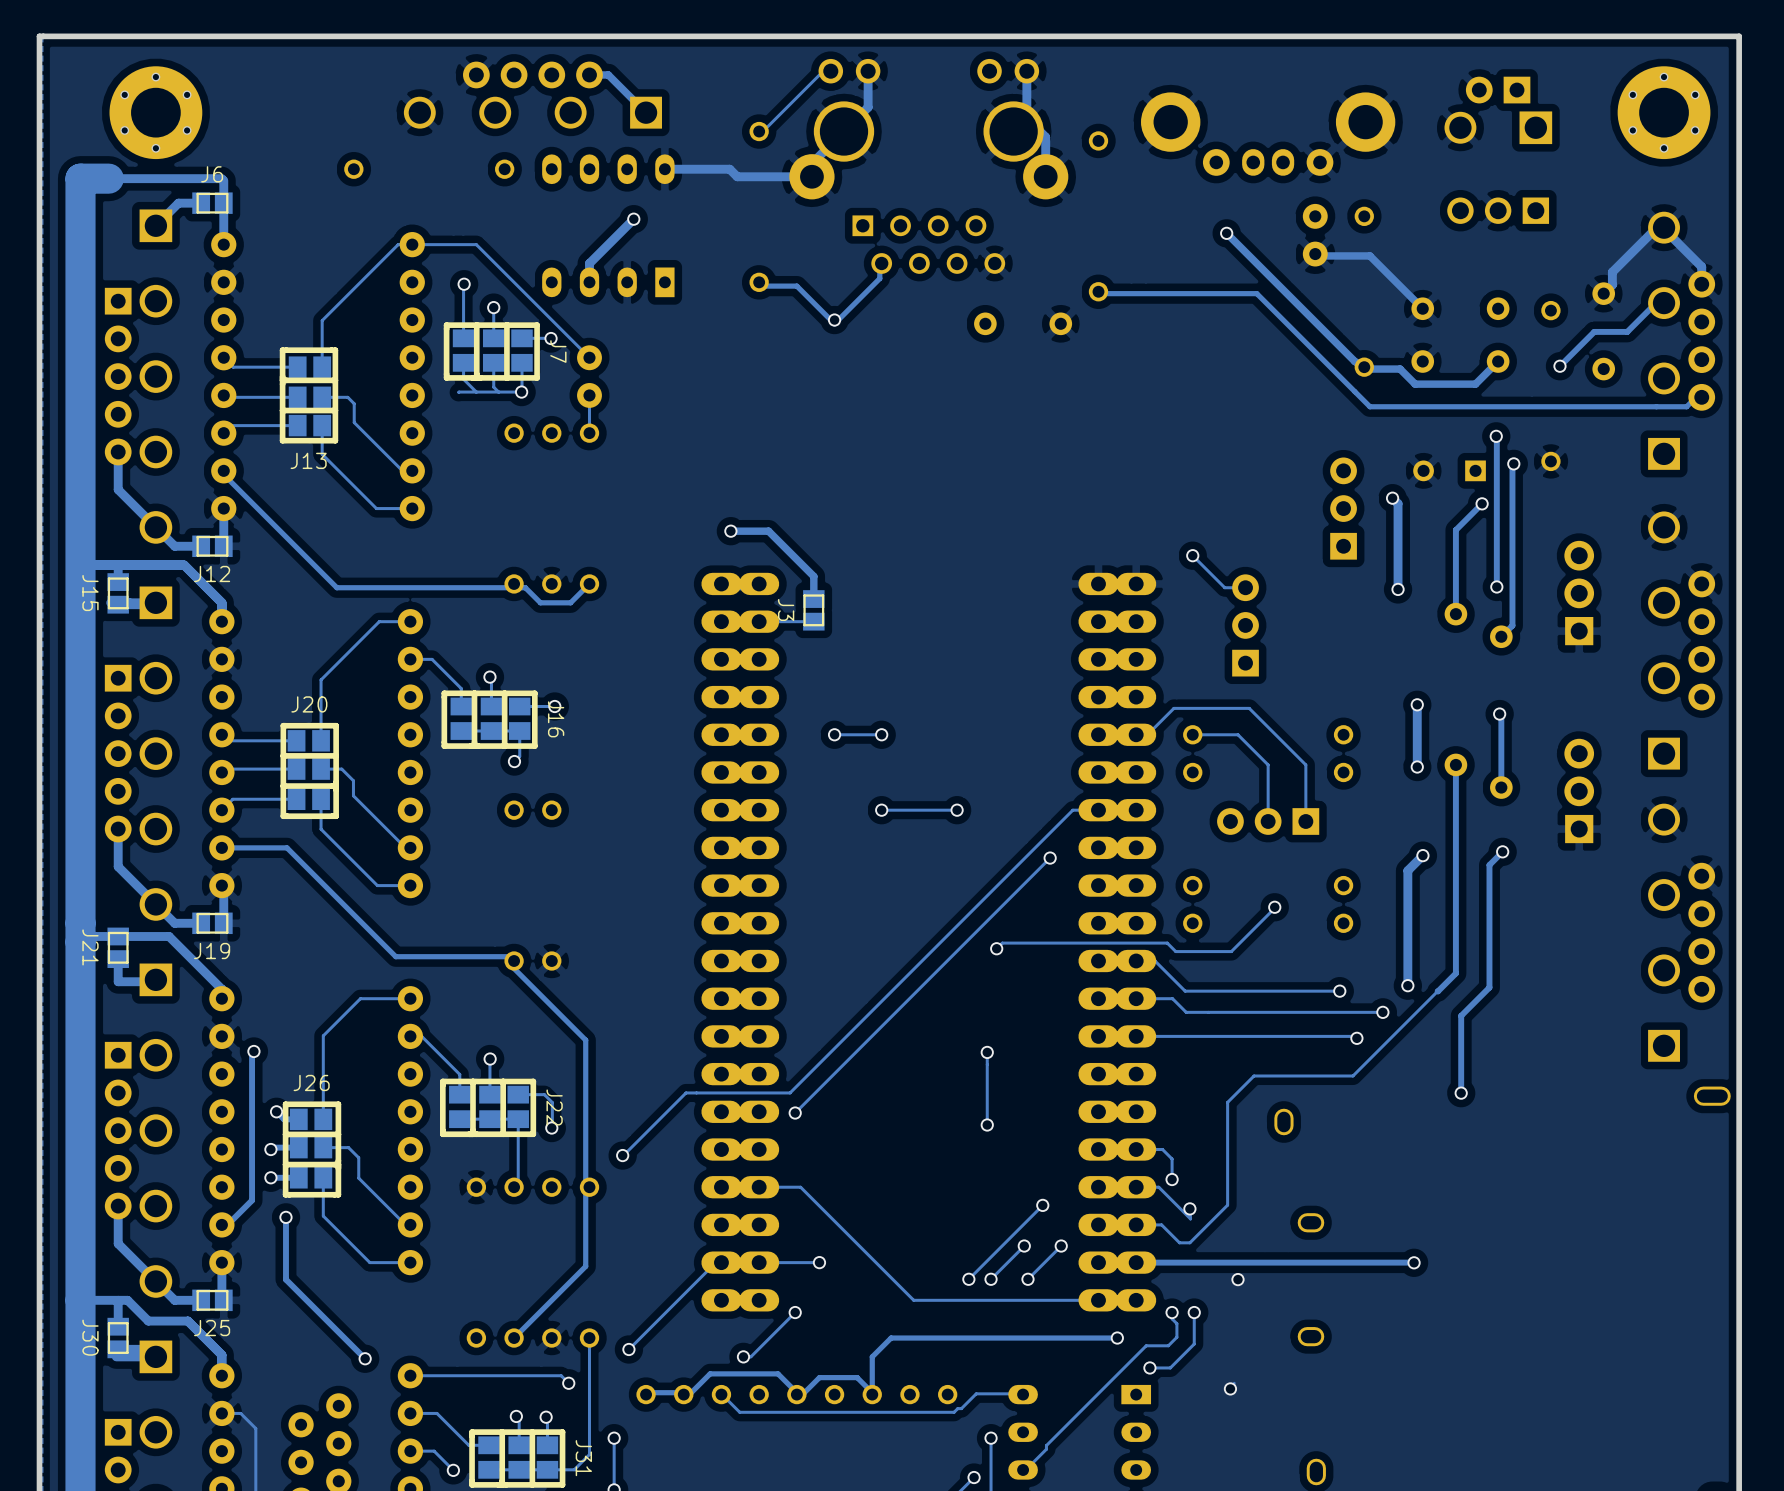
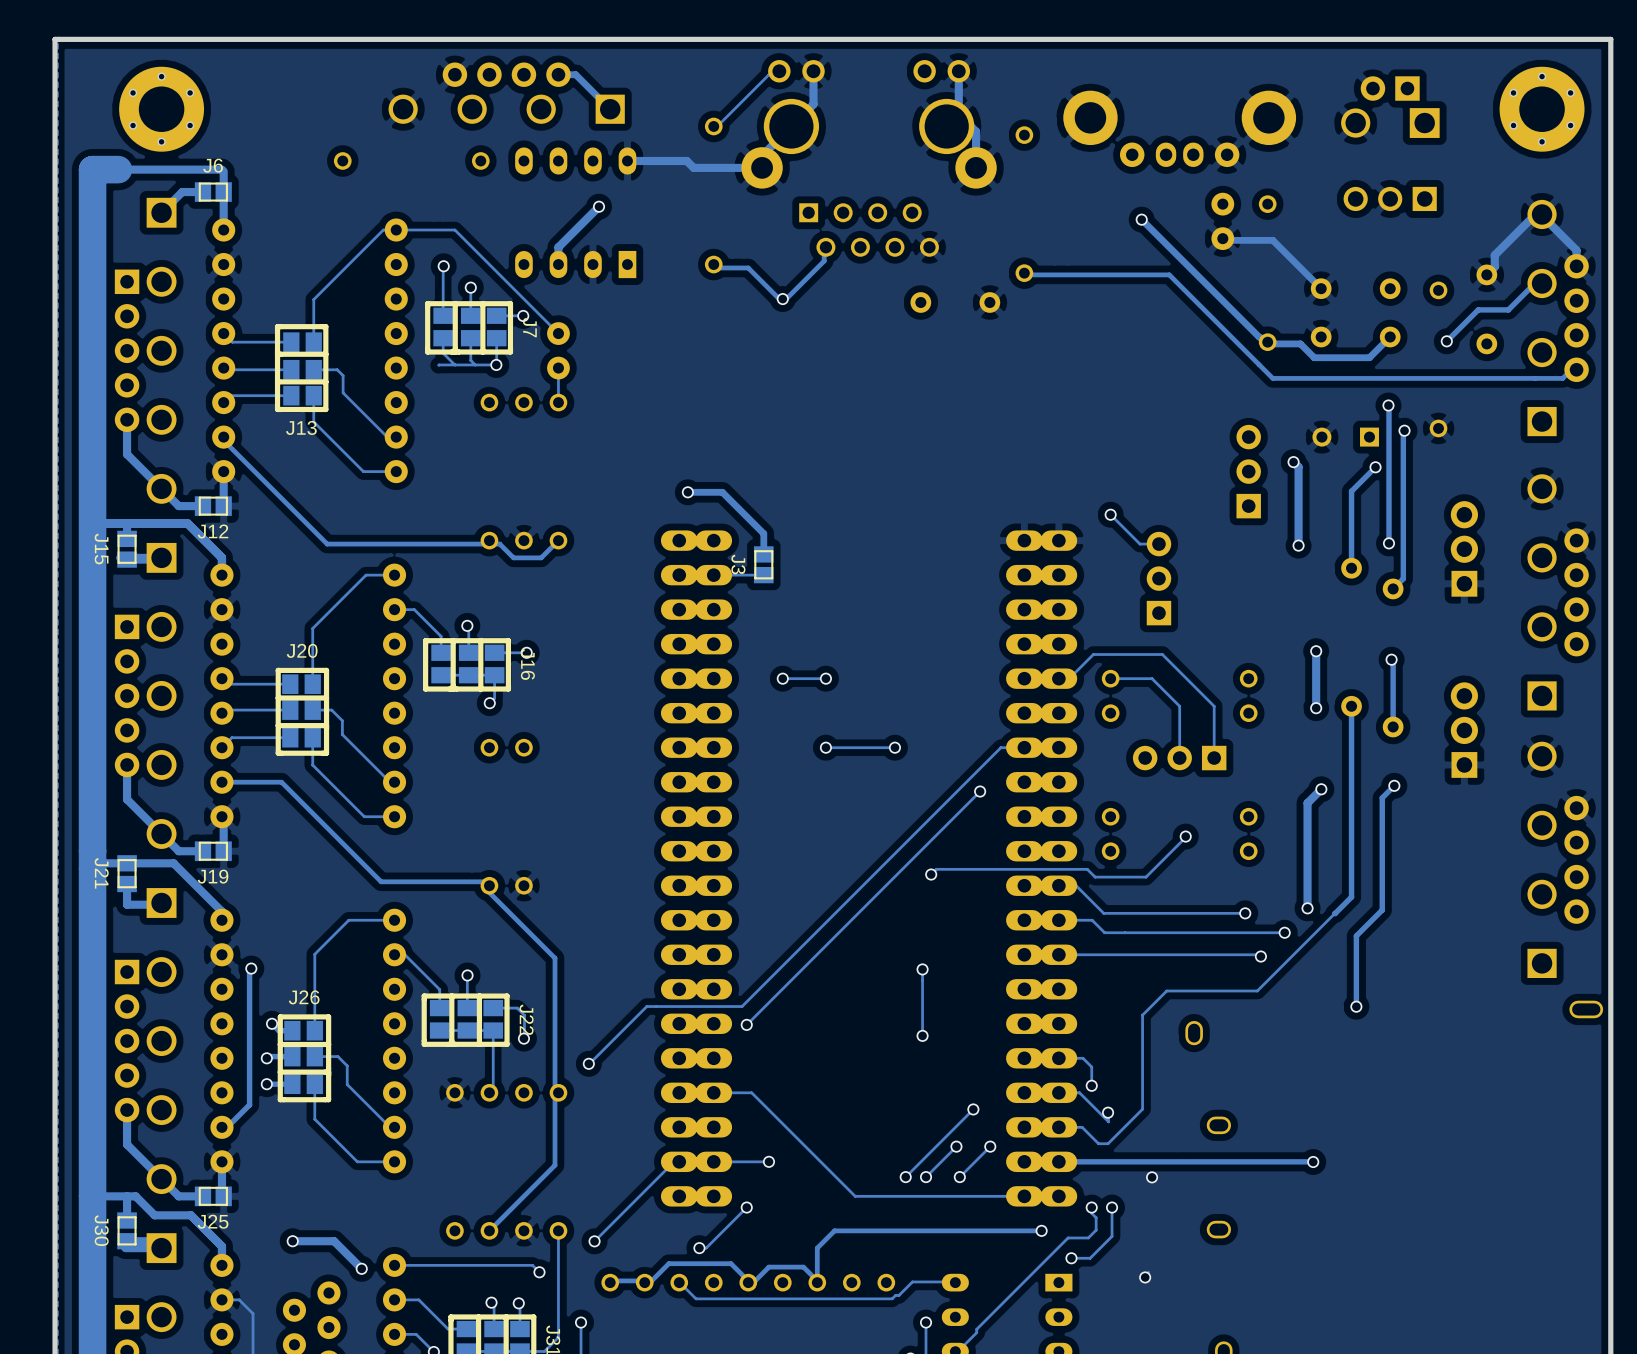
track: (285, 1217) (285, 1279) (365, 1358) -> none
via: (285, 1217) -> none
track: none -> (292, 1241) (334, 1241) (361, 1268)
via: none -> (292, 1241)
via position: (365, 1358) -> (361, 1268)

